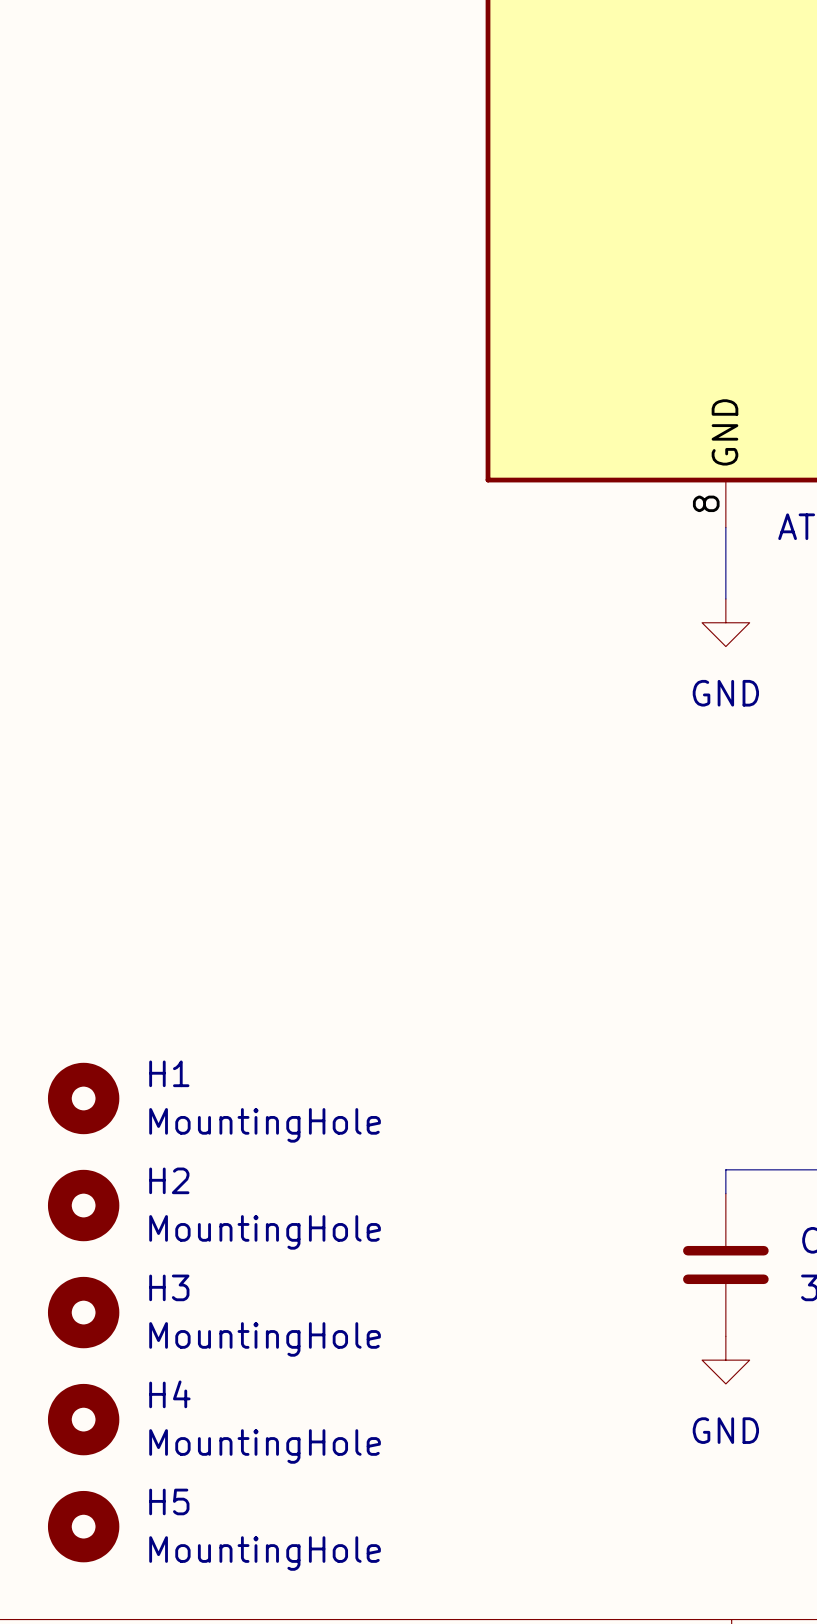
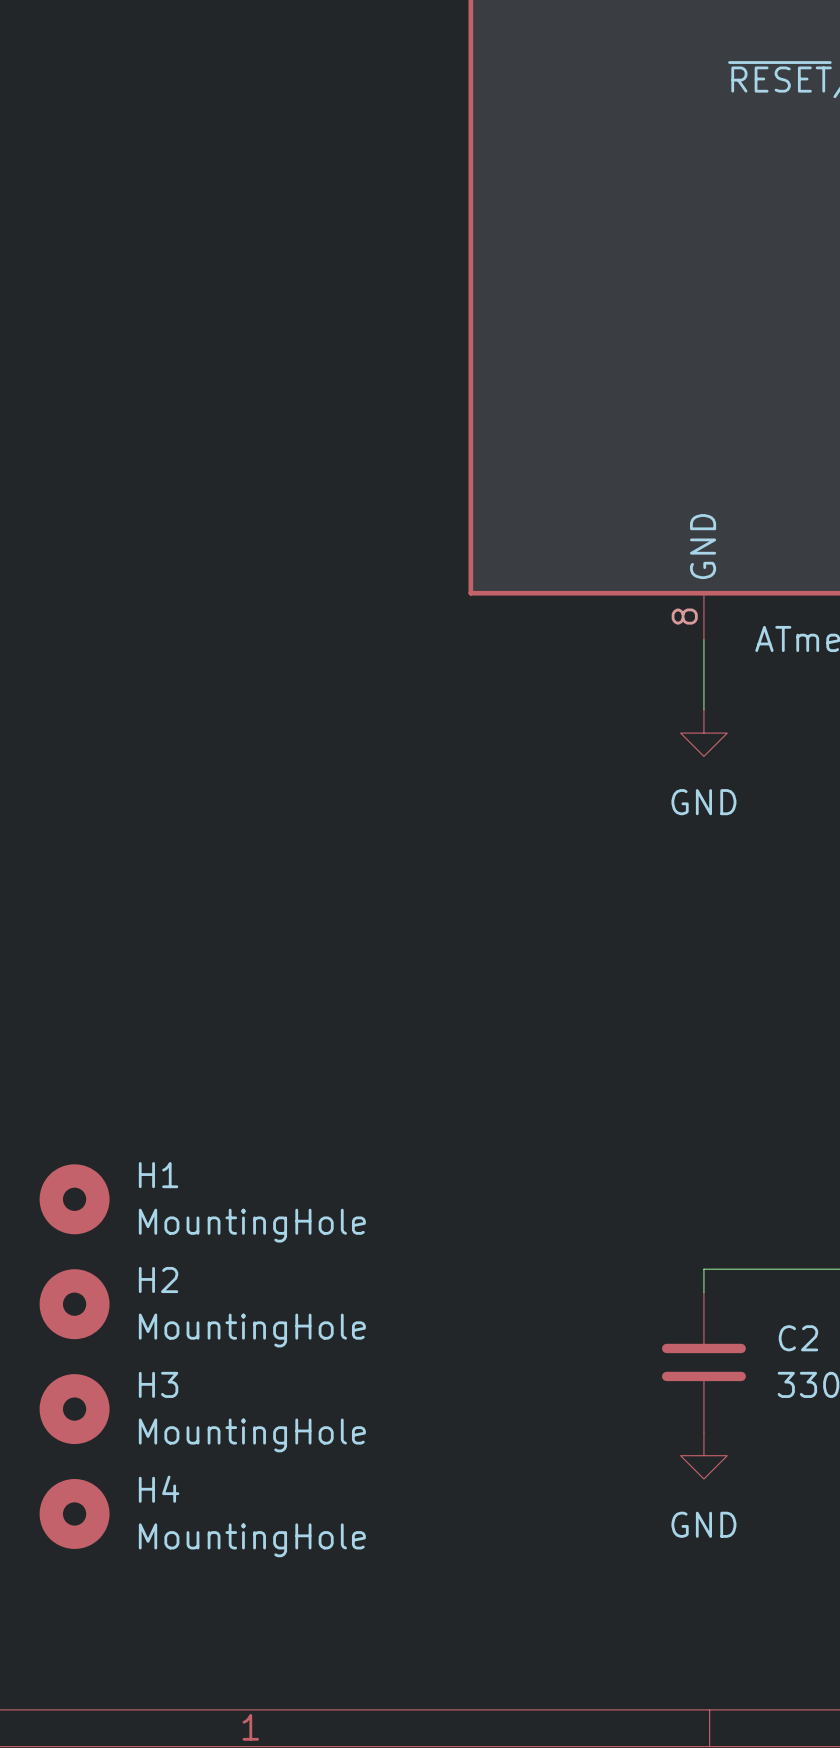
H5: MountingHole (83, 1526) -> none

